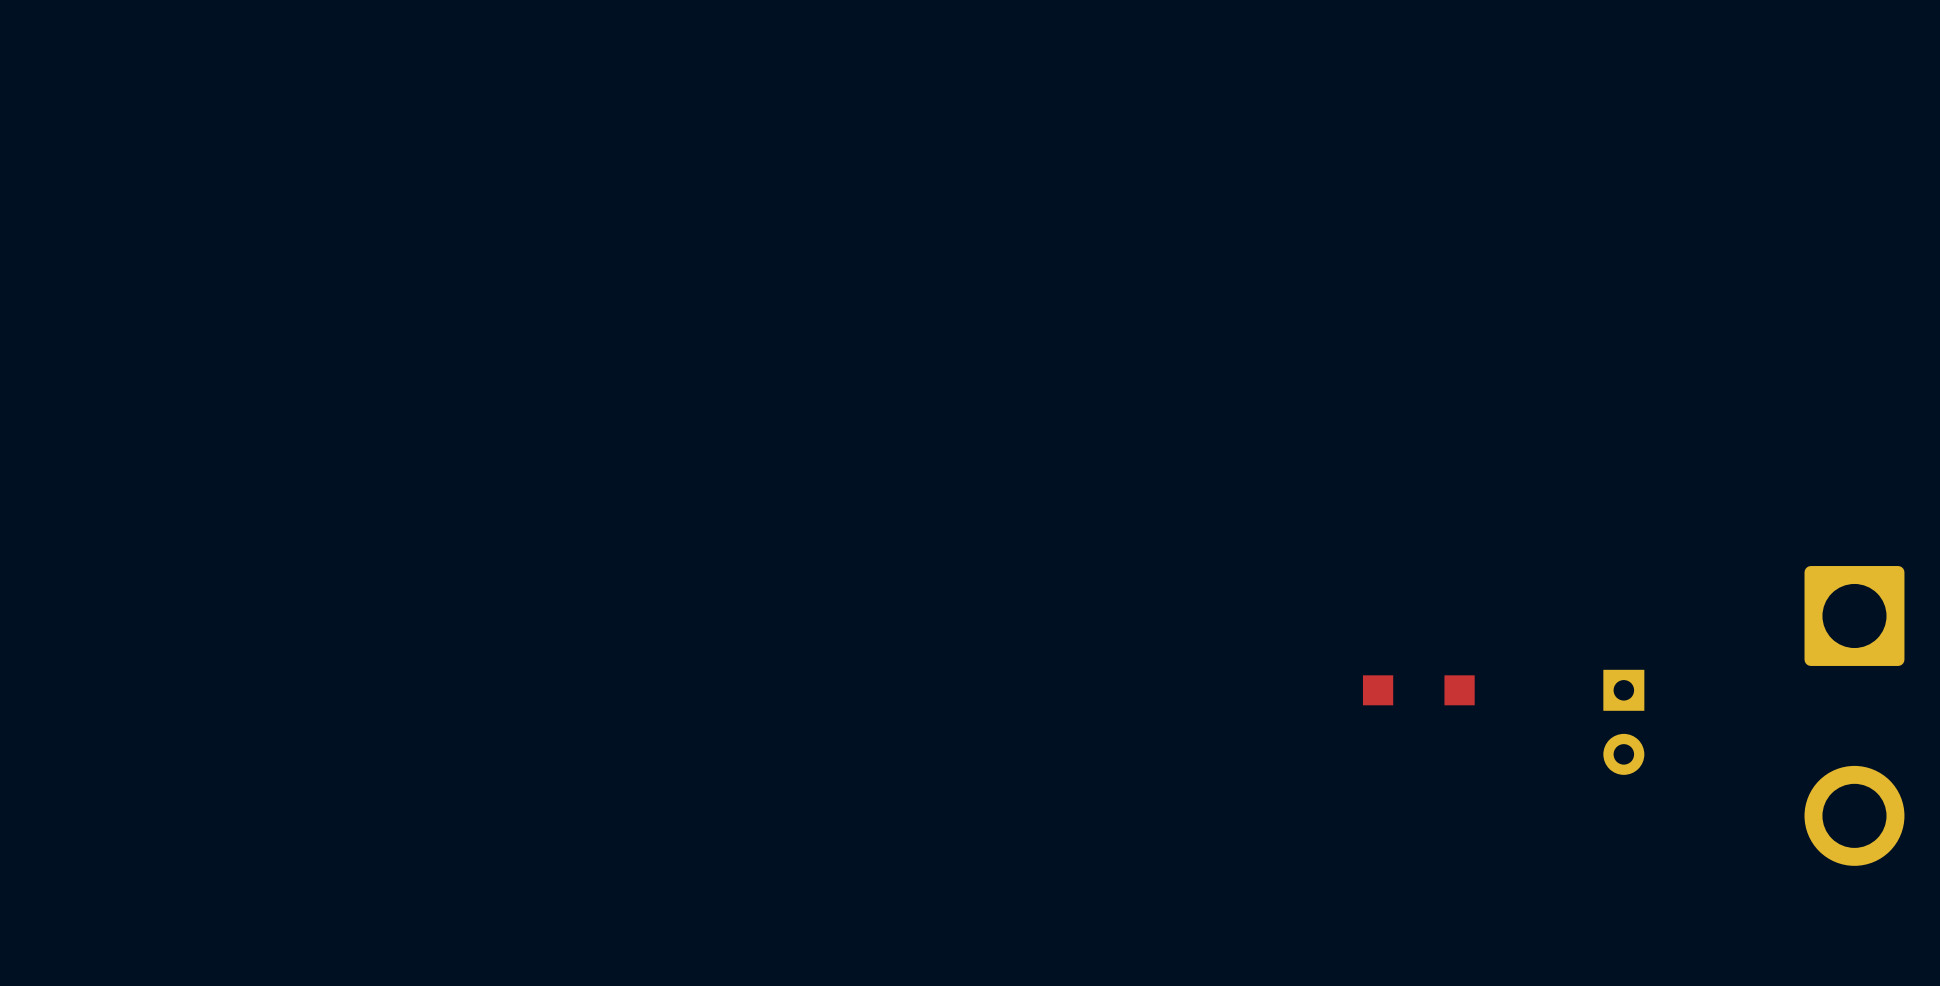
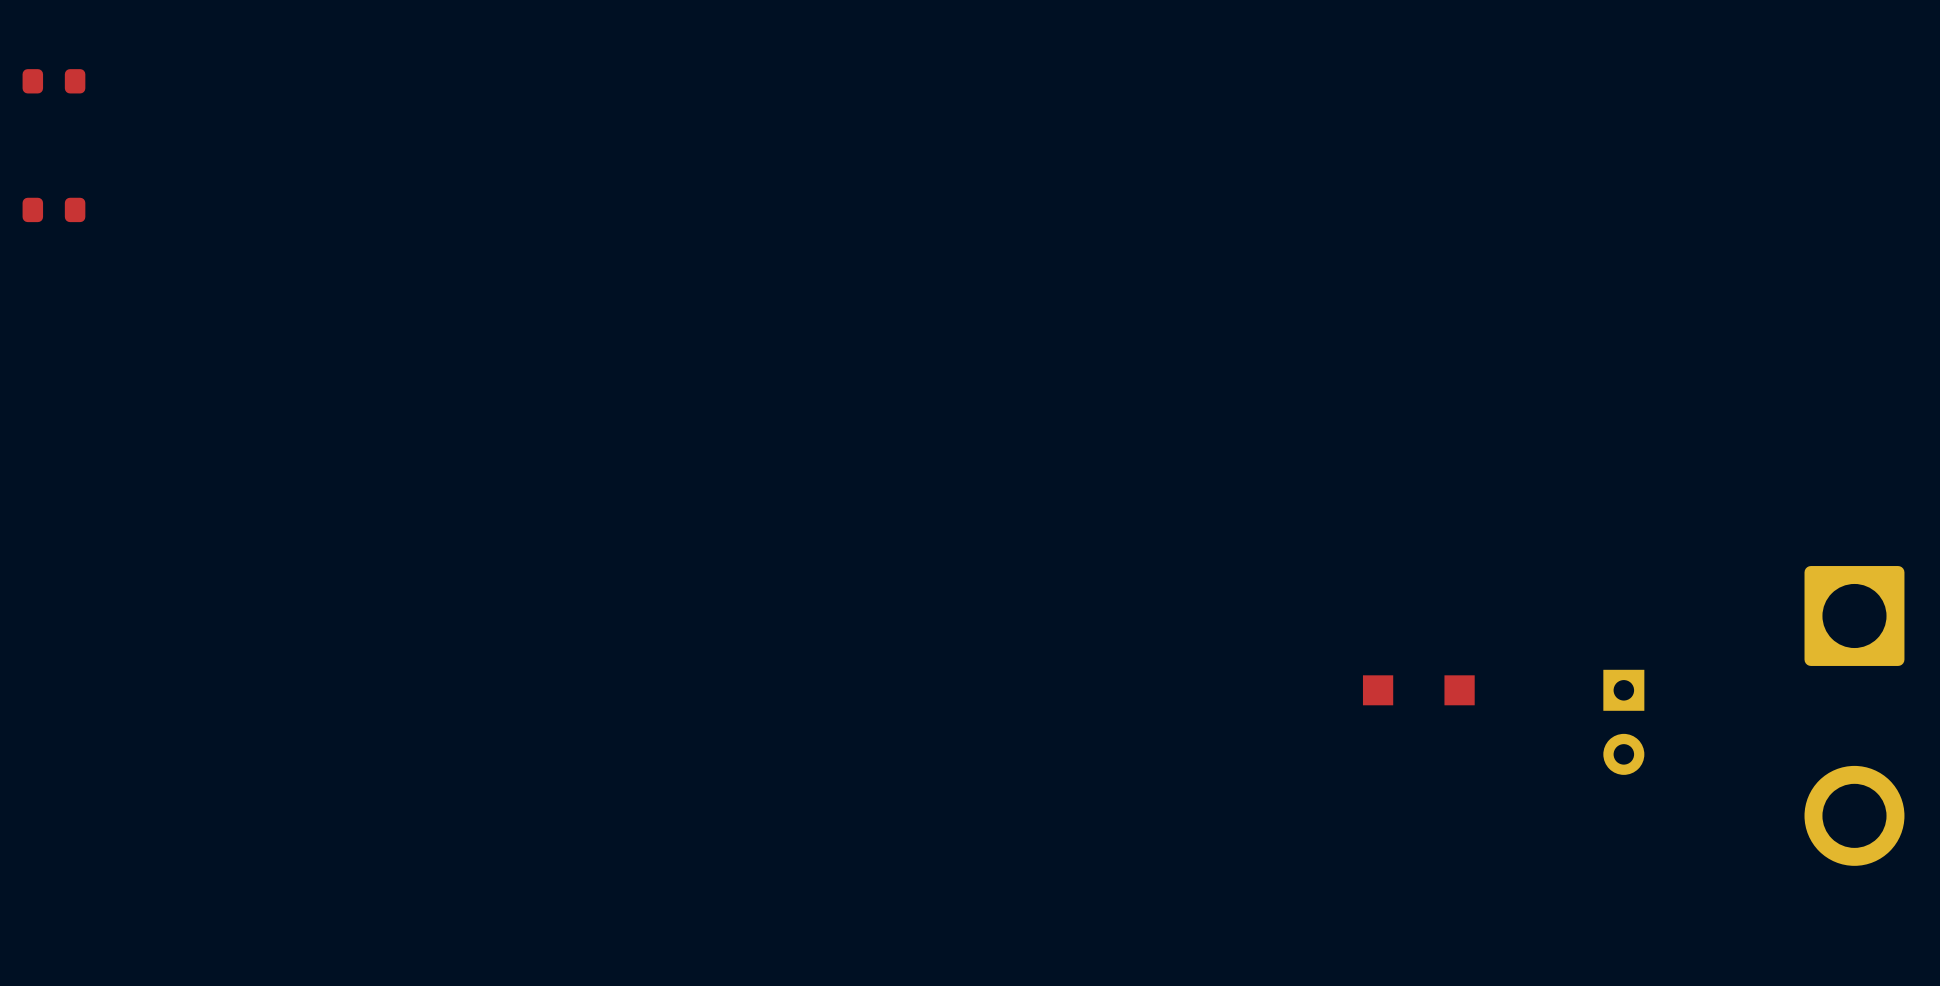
part: none -> (53, 81)
part: none -> (53, 209)

